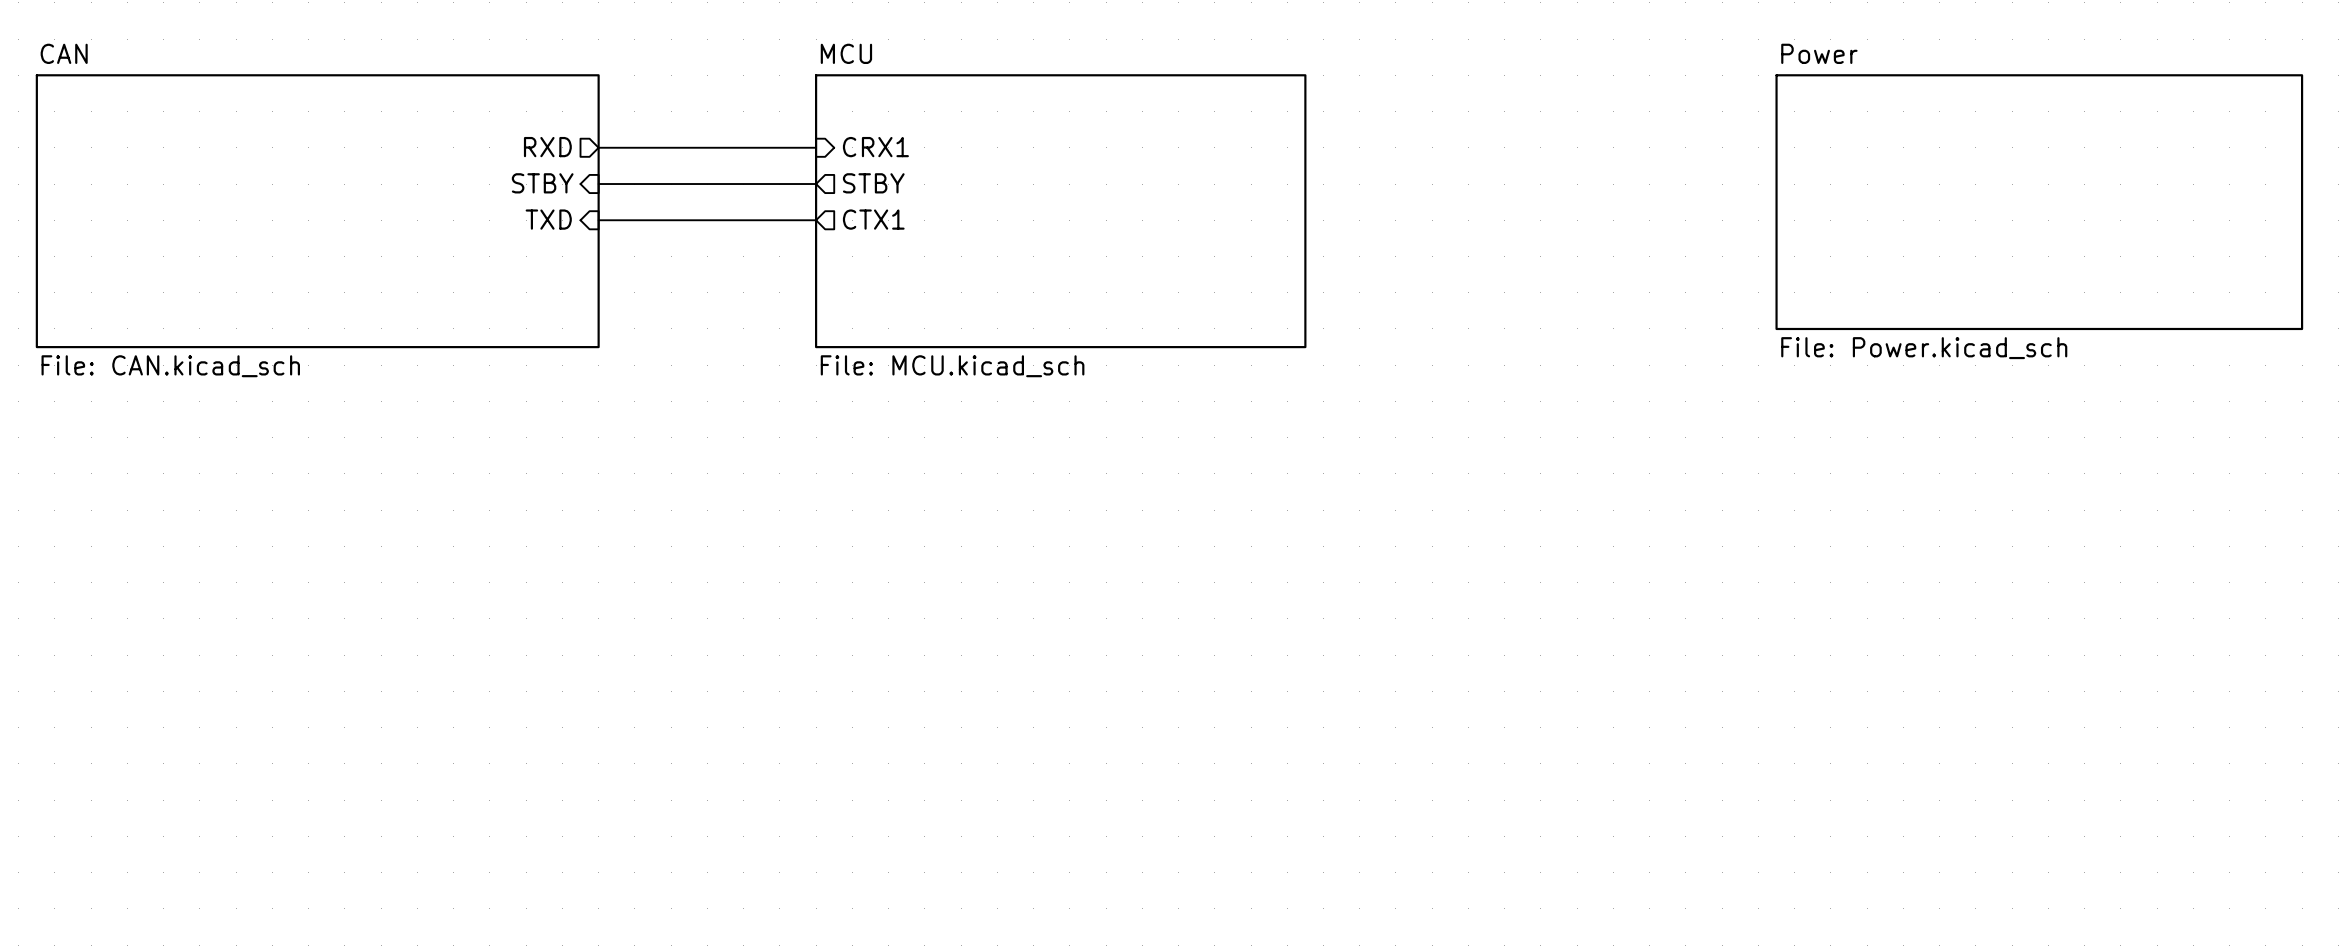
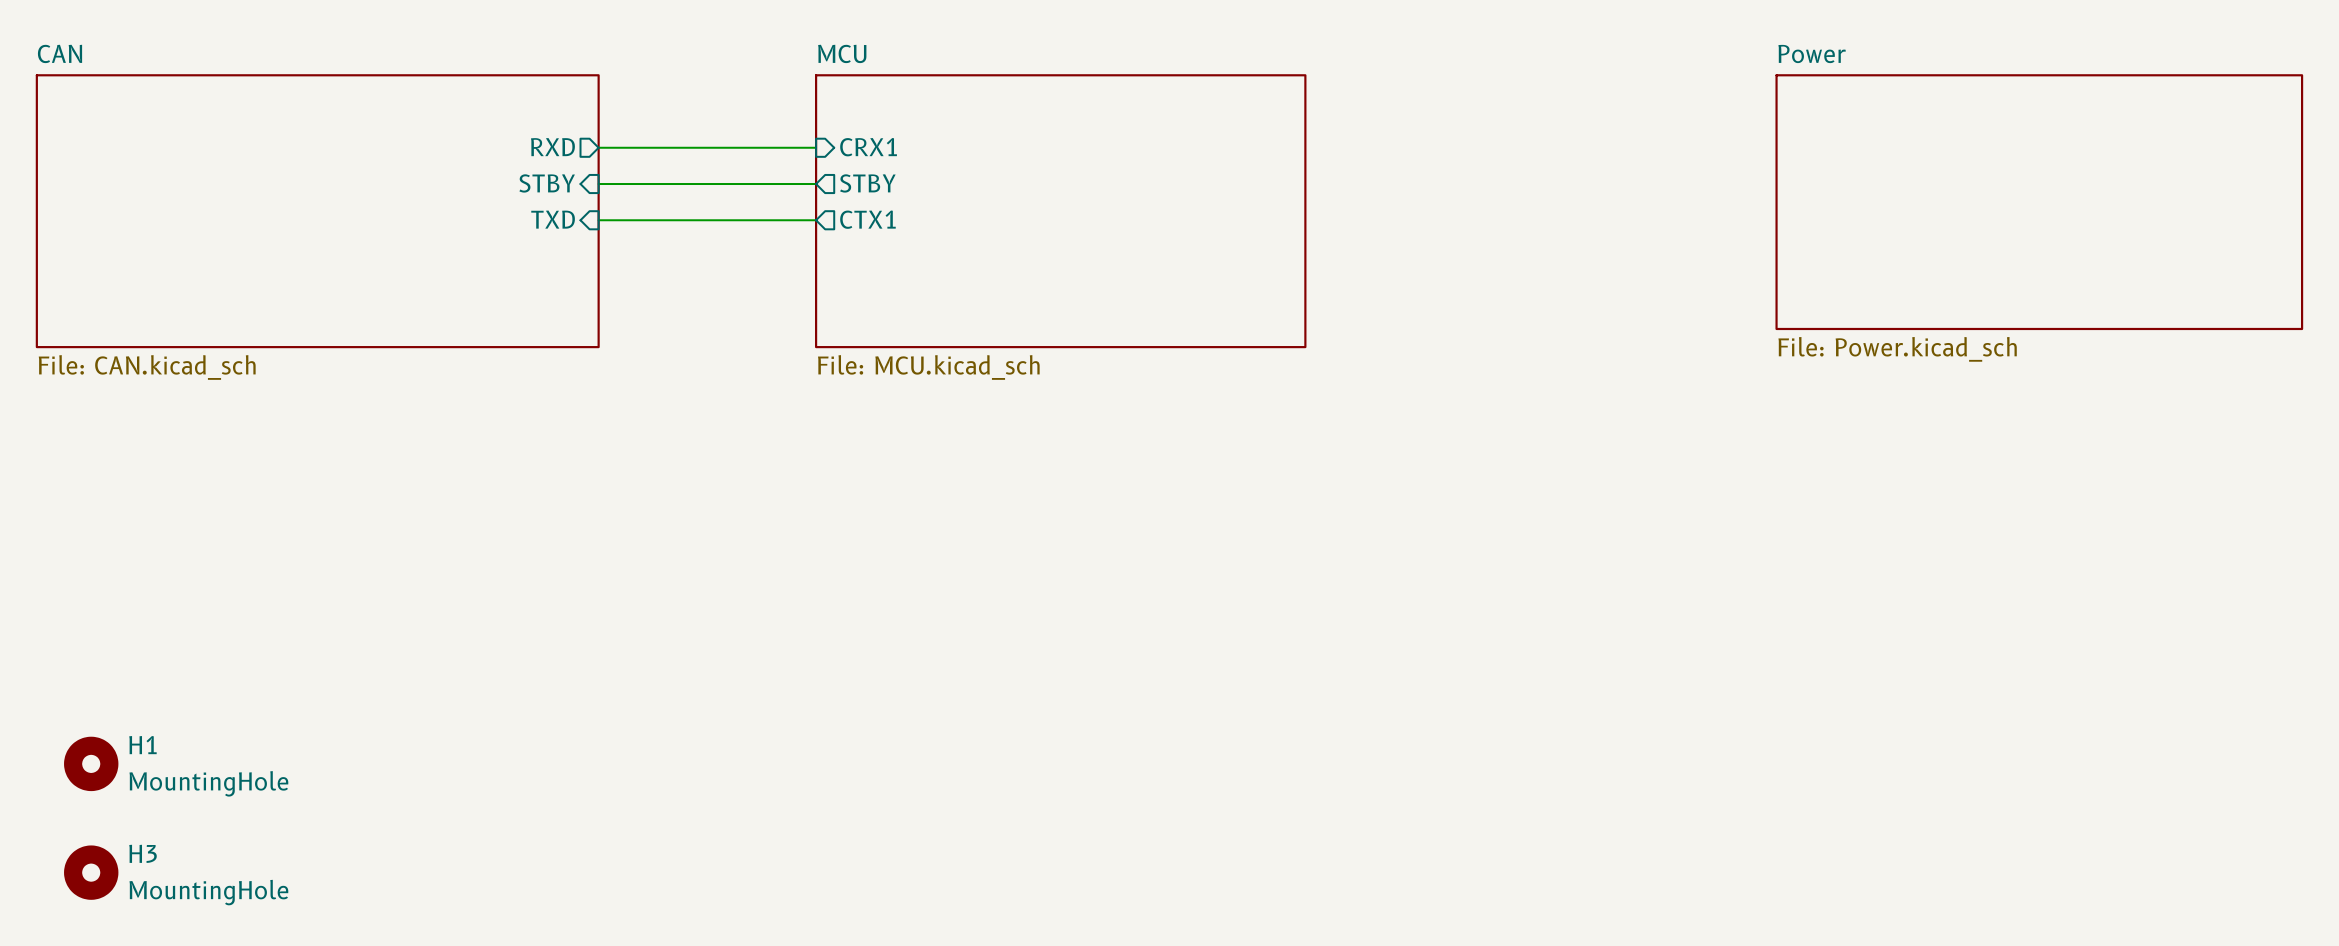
H1: none -> MountingHole (91, 763)
H3: none -> MountingHole (91, 872)

